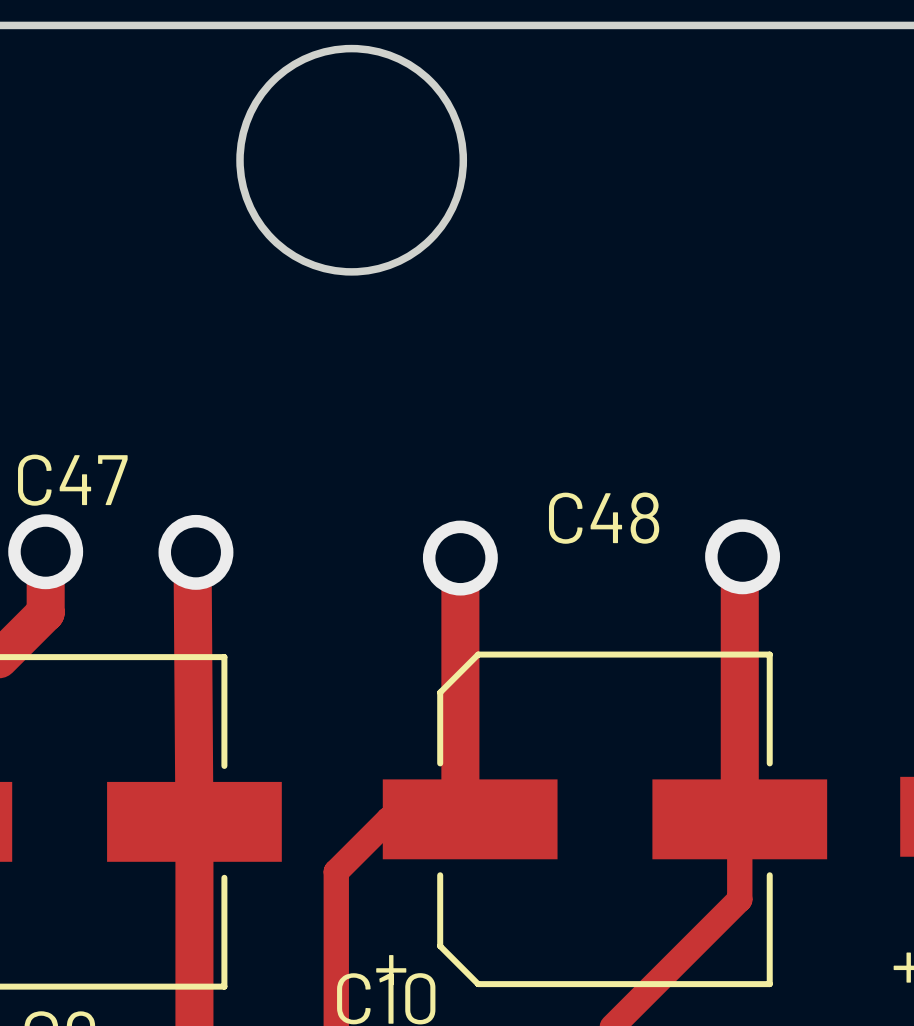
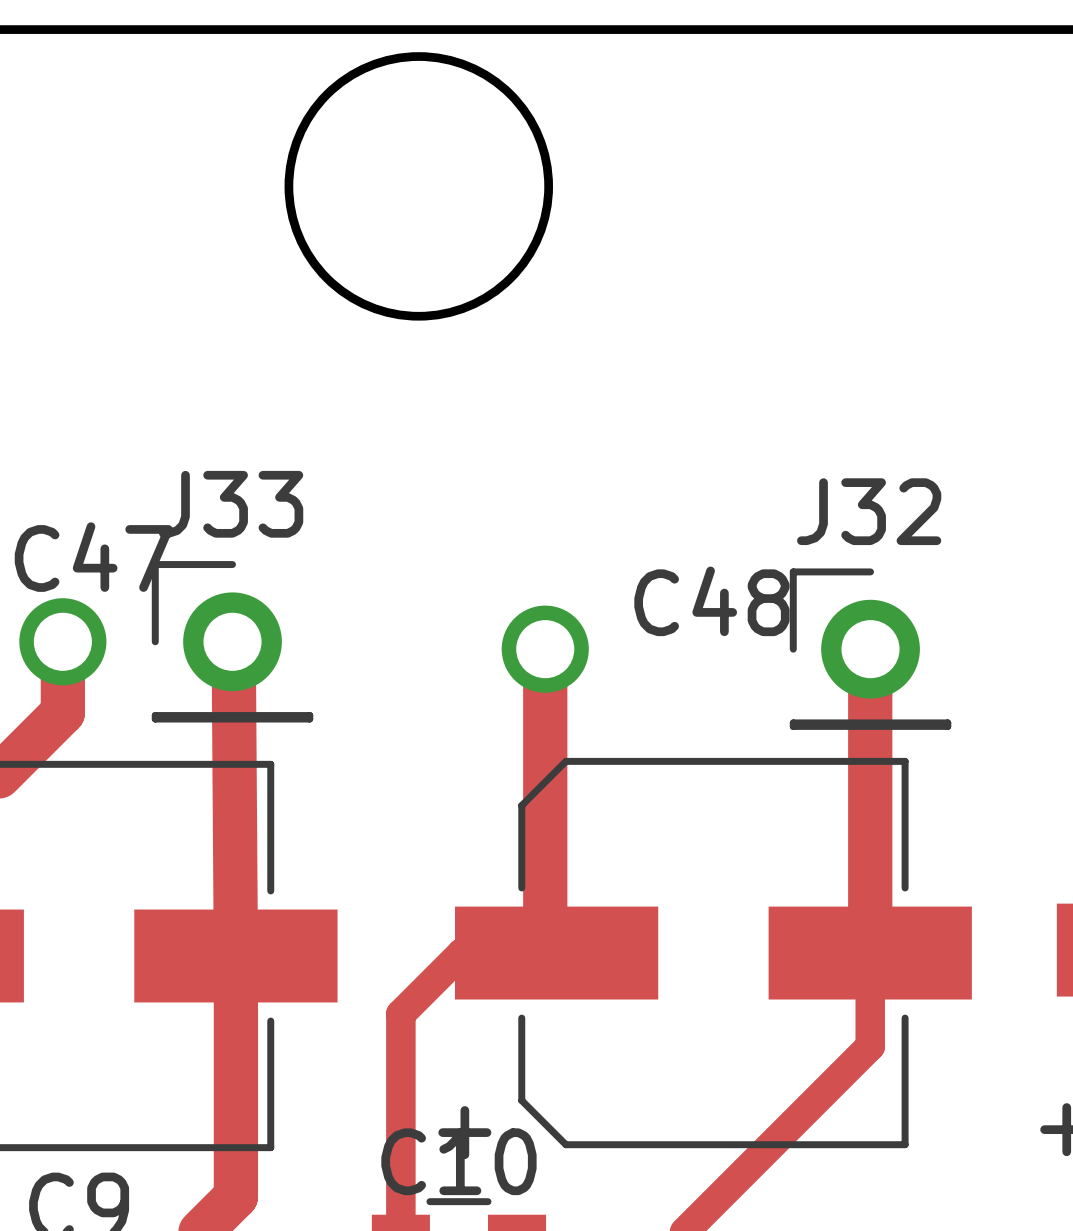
J33: none -> (232, 641)
via: (195, 552) -> none
via: (742, 556) -> none
J32: none -> (870, 649)

